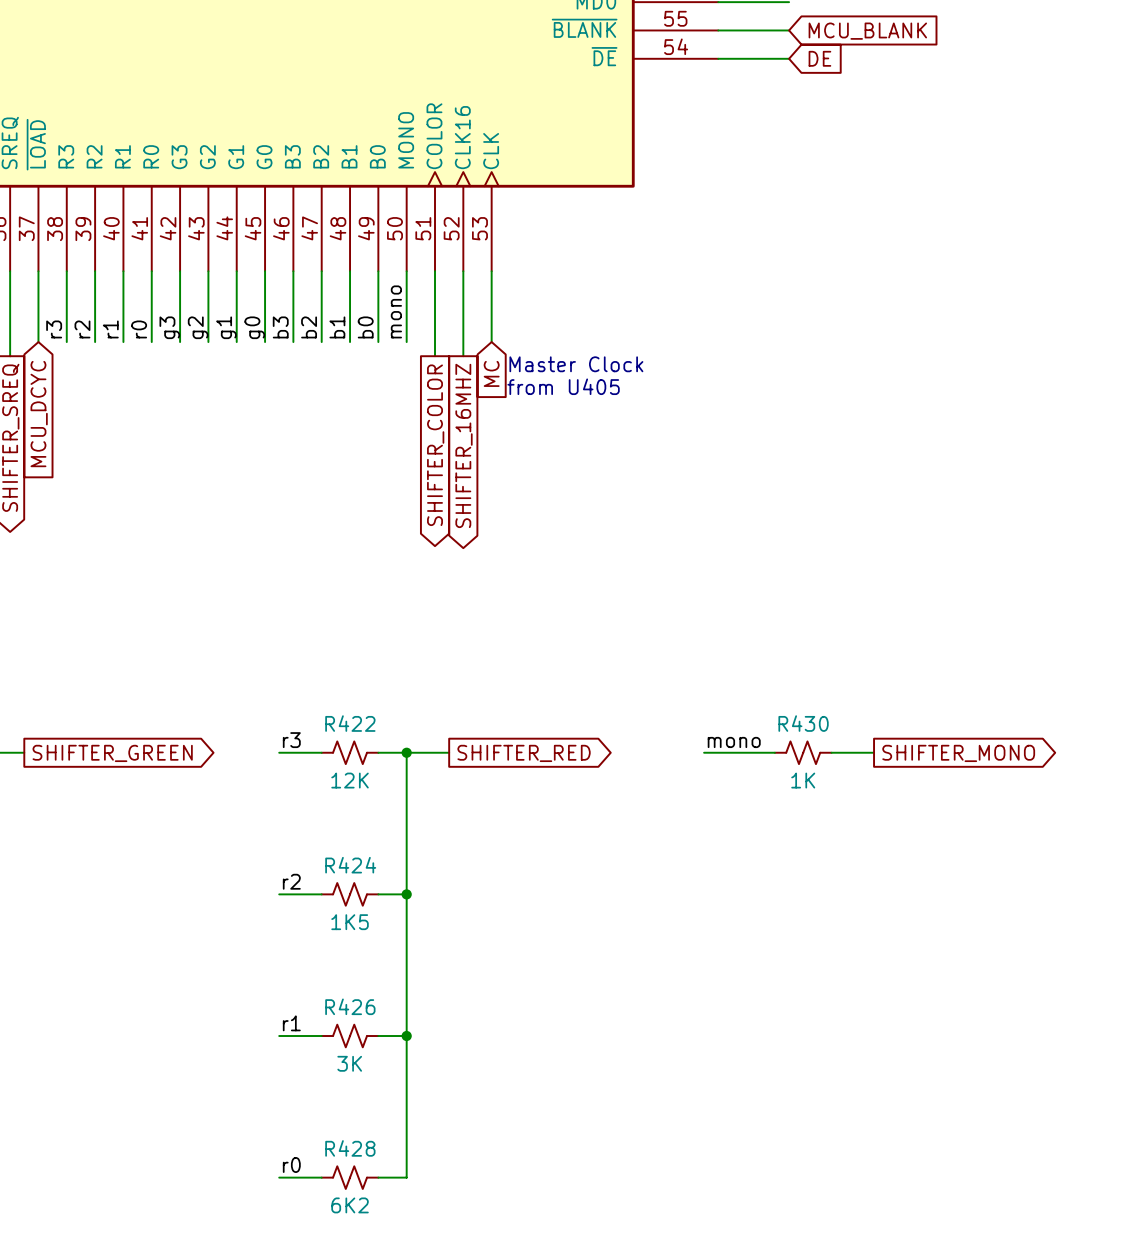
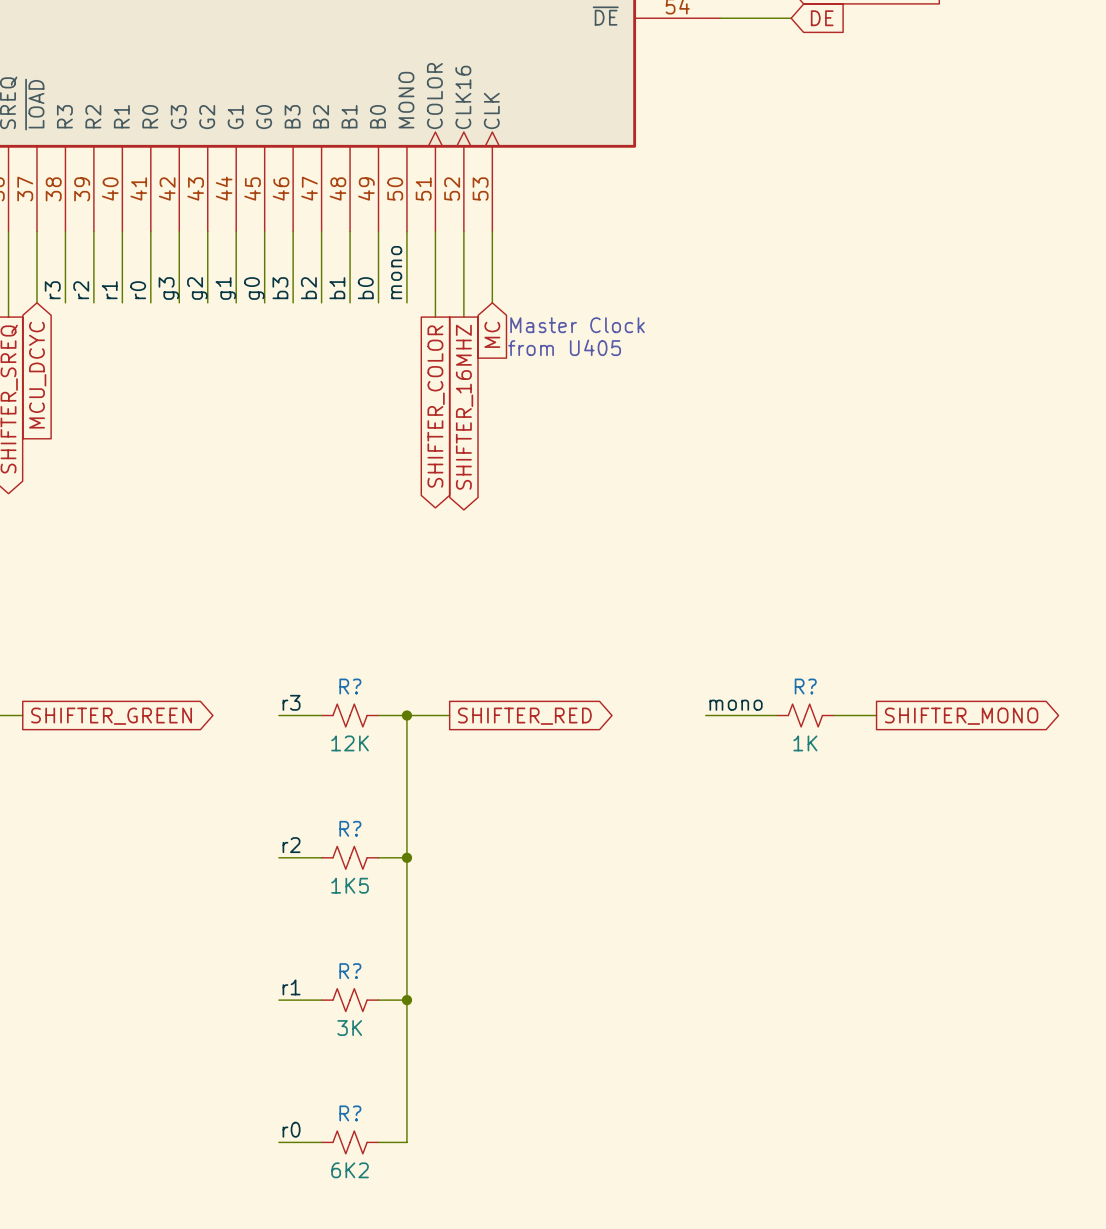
R422 name: R422 (350, 723) -> R? (350, 686)
R430 name: R430 (803, 723) -> R? (805, 686)
R424 name: R424 (350, 865) -> R? (350, 828)
R426 name: R426 (350, 1006) -> R? (350, 971)
R428 name: R428 (350, 1148) -> R? (350, 1113)

